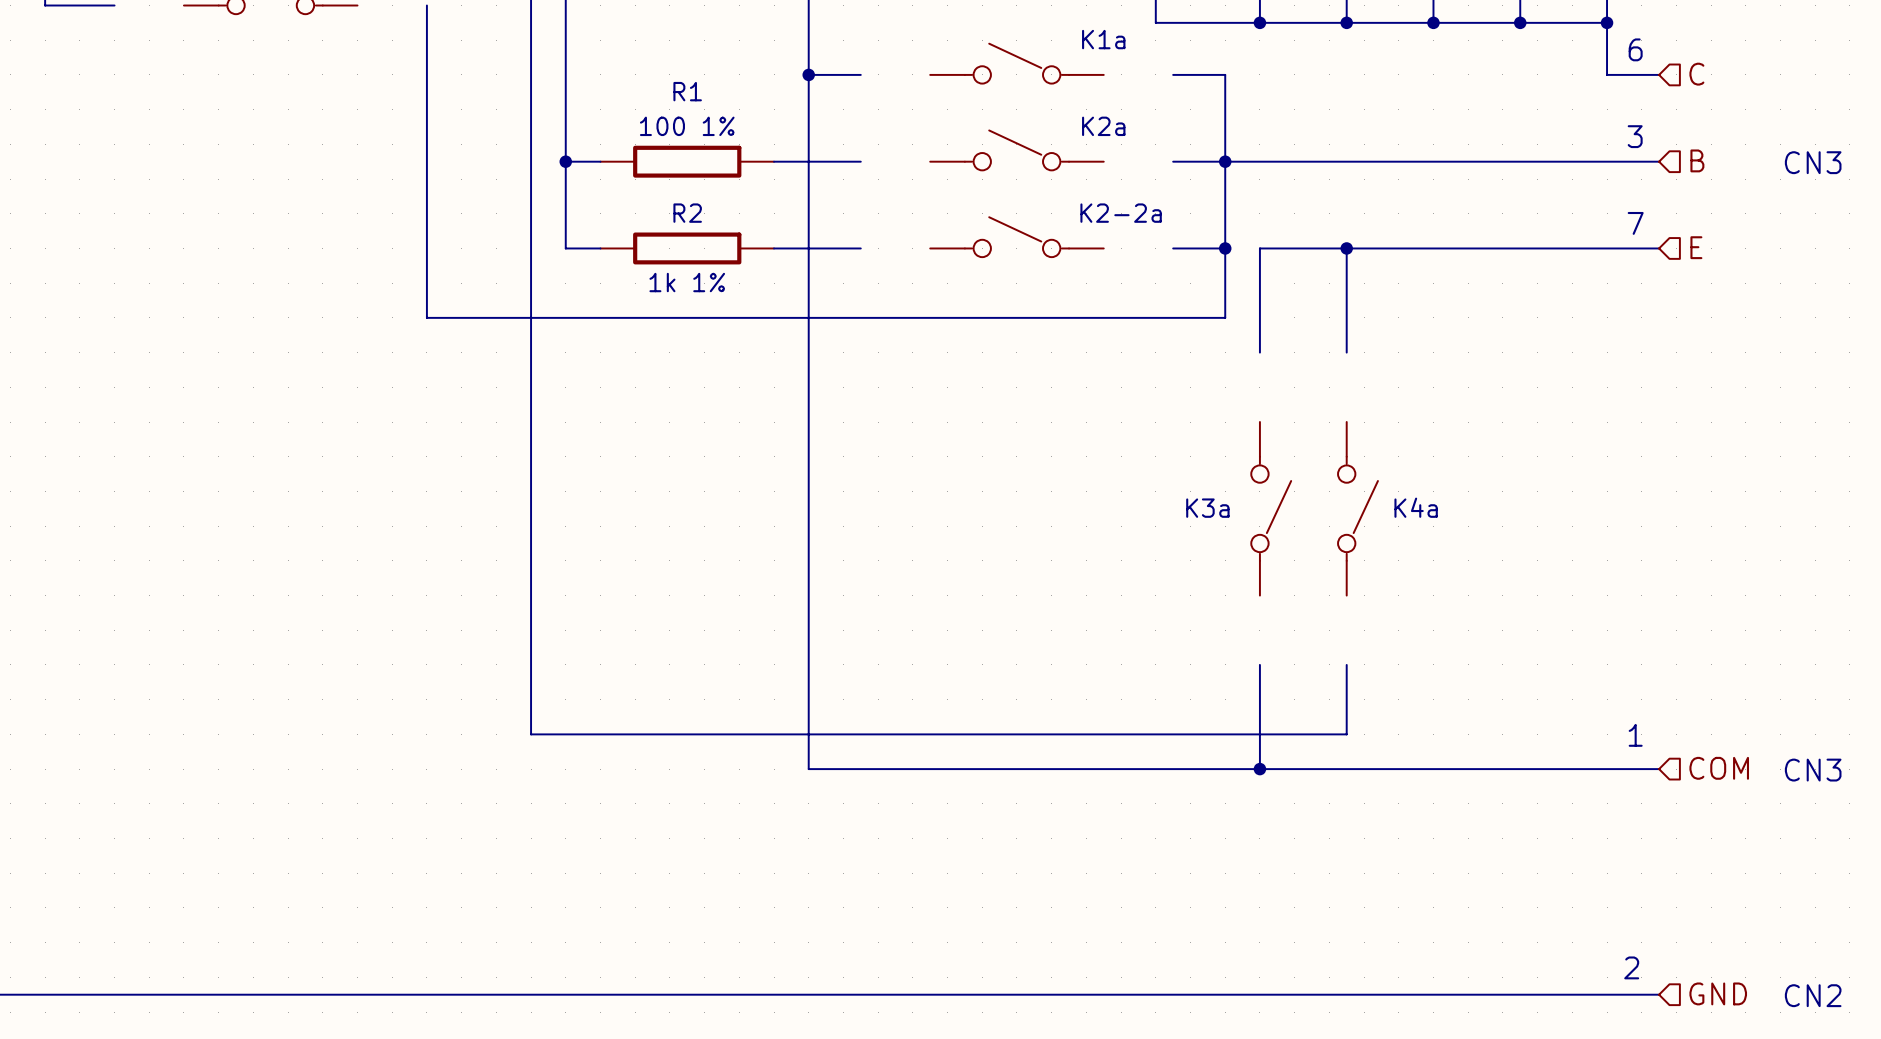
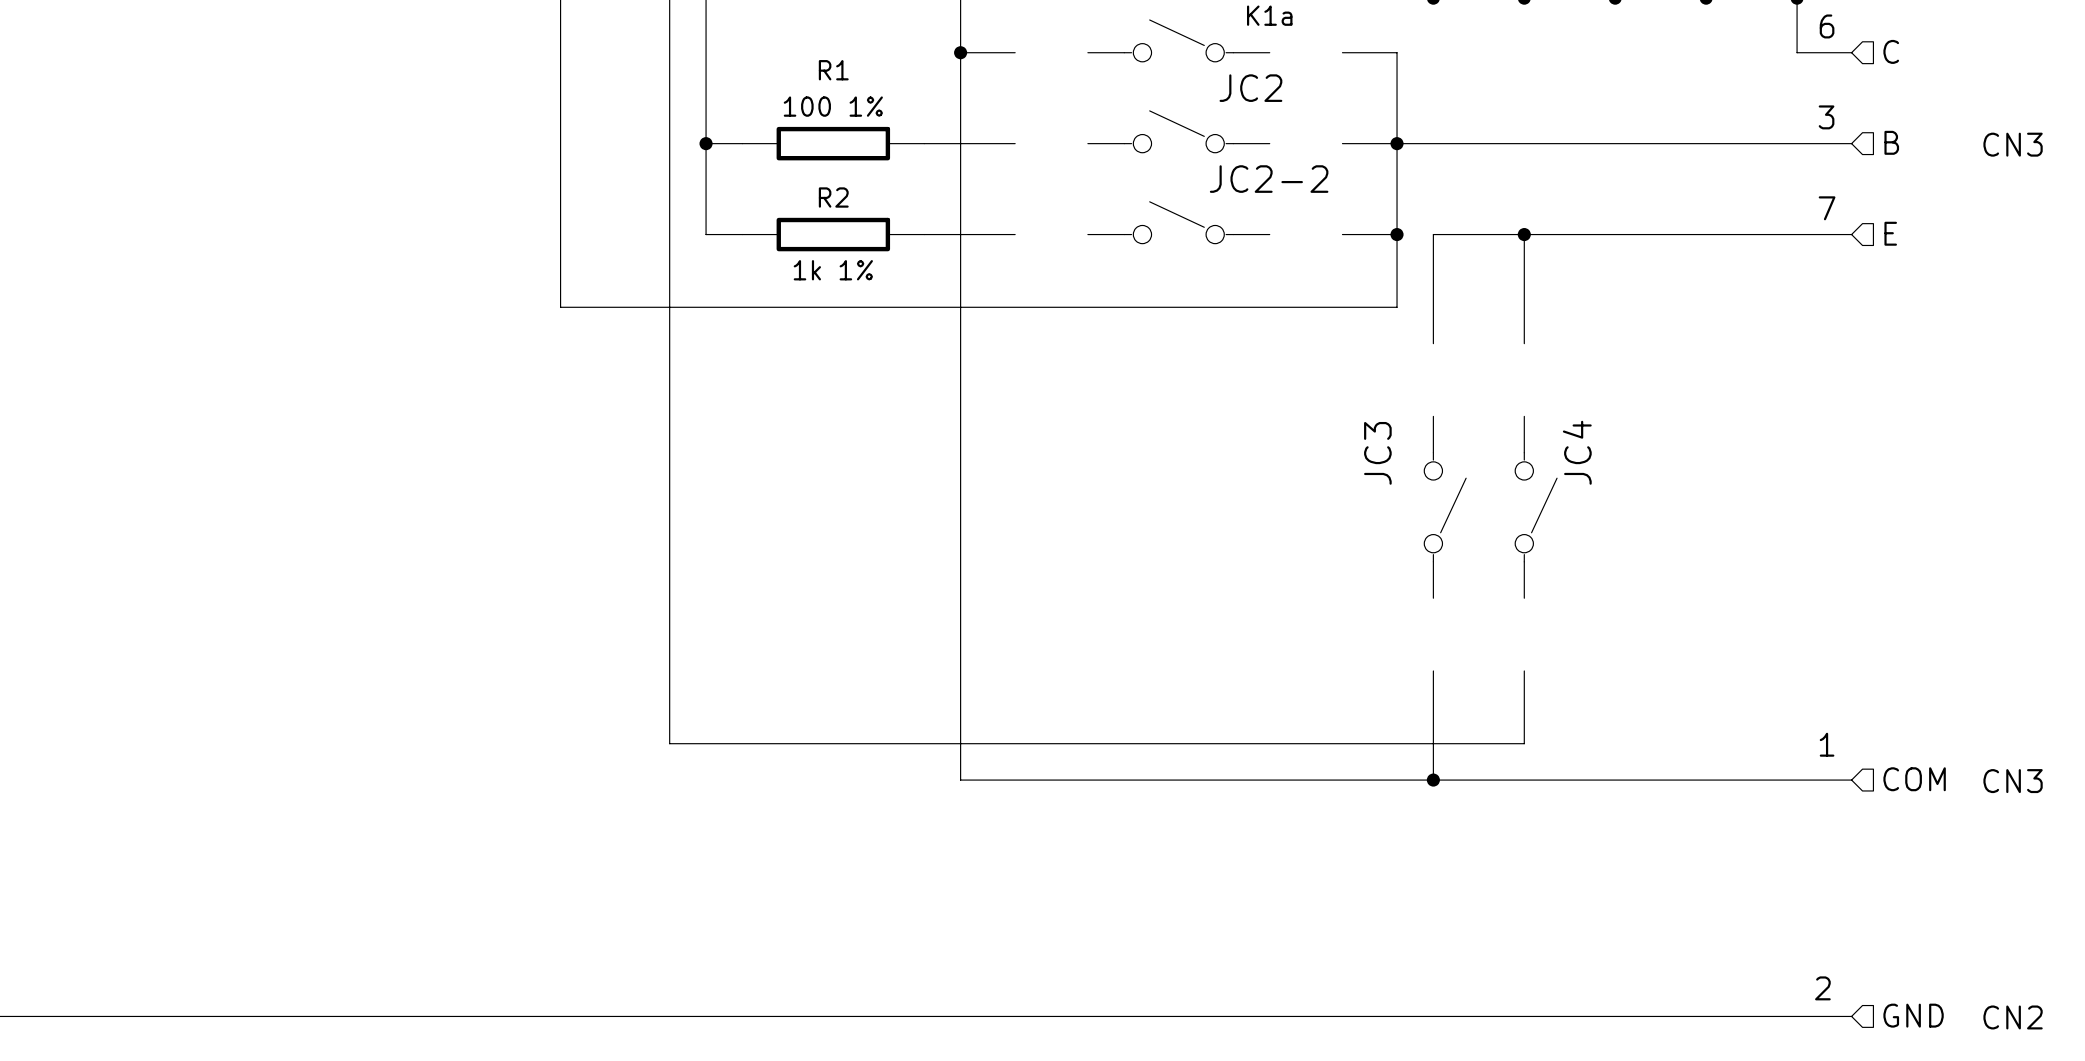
K2a name: K2a (1103, 126) -> JC2 (1250, 88)
K2-2a name: K2-2a (1121, 213) -> JC2-2 (1269, 179)
K4a name: K4a (1416, 507) -> JC4 (1577, 452)
K3a name: K3a (1207, 508) -> JC3 (1377, 453)

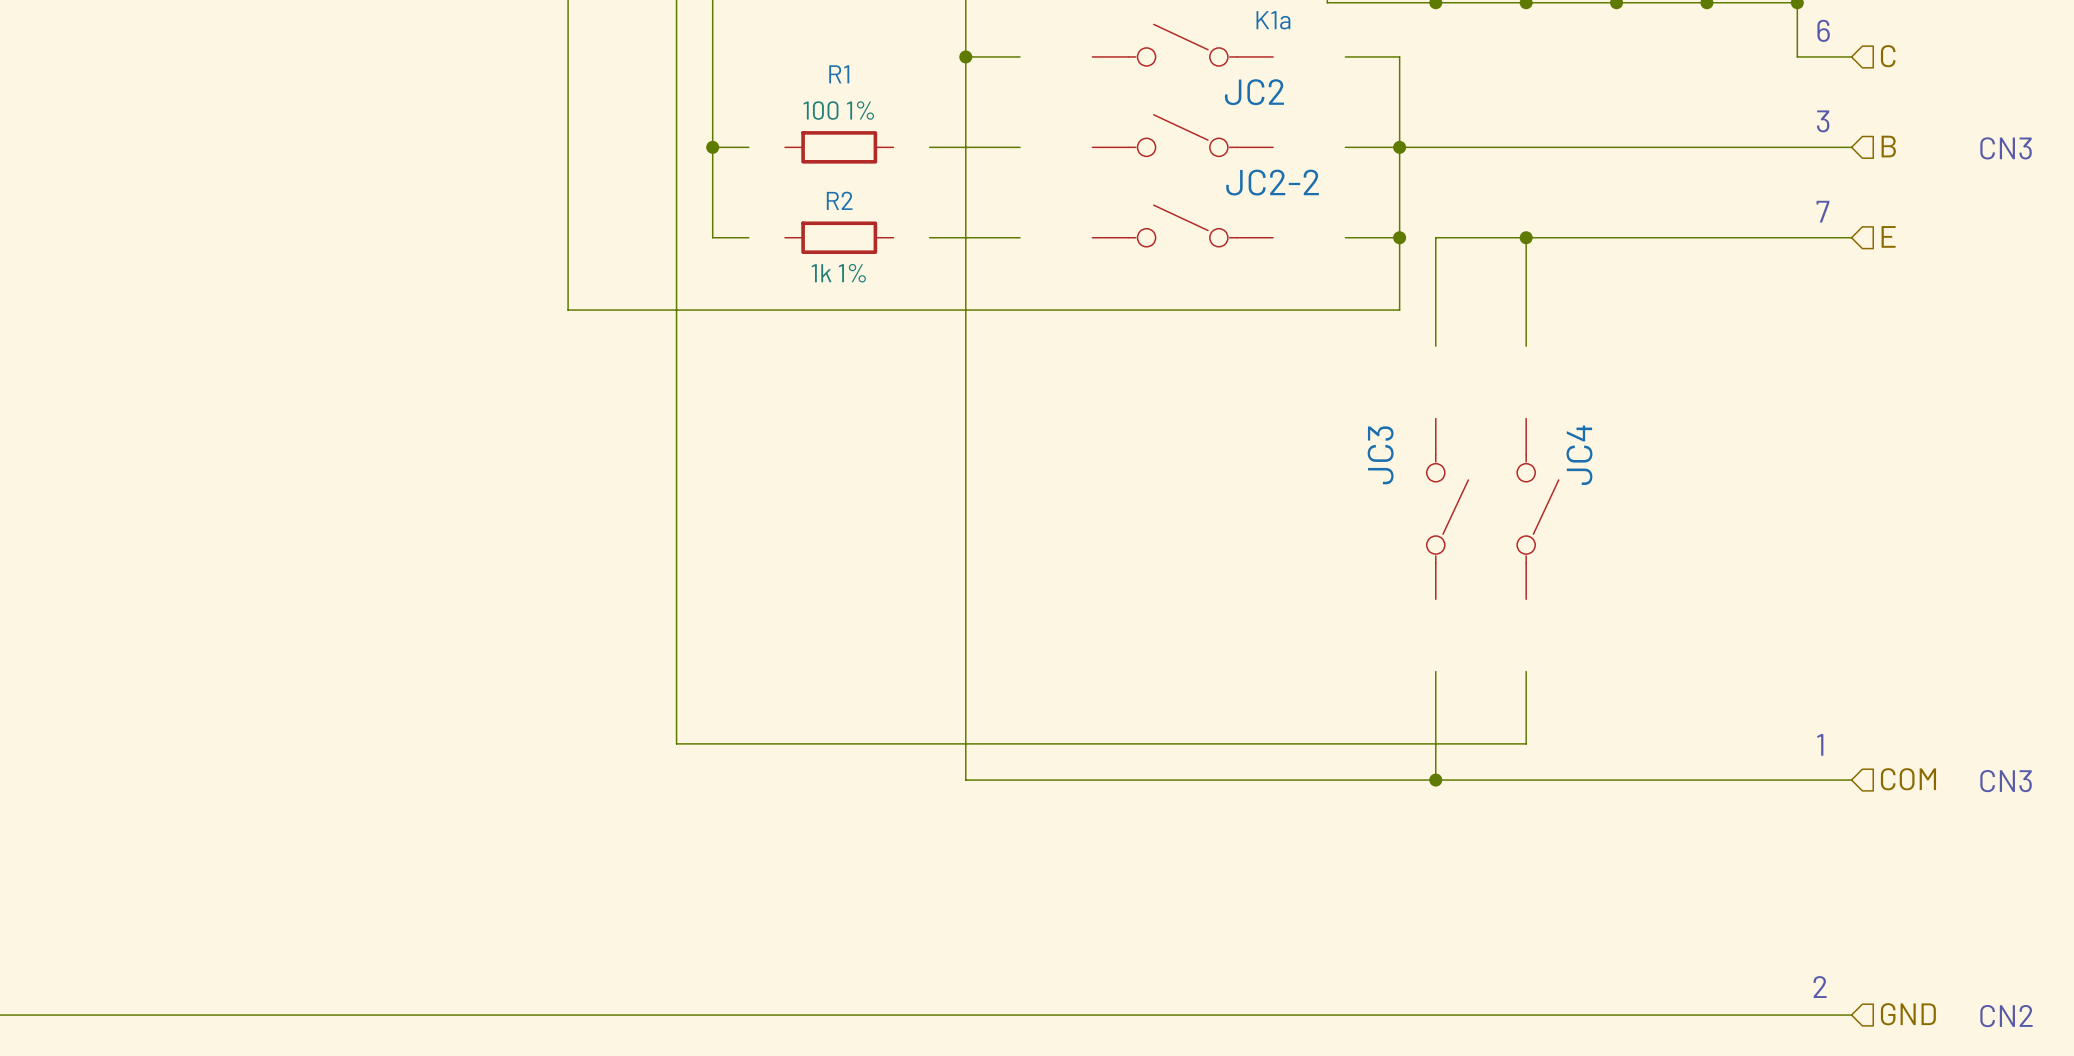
R1 symbol: [742, 126, 925, 161] -> [785, 131, 894, 164]
R2 symbol: [742, 217, 925, 252] -> [785, 221, 894, 255]

